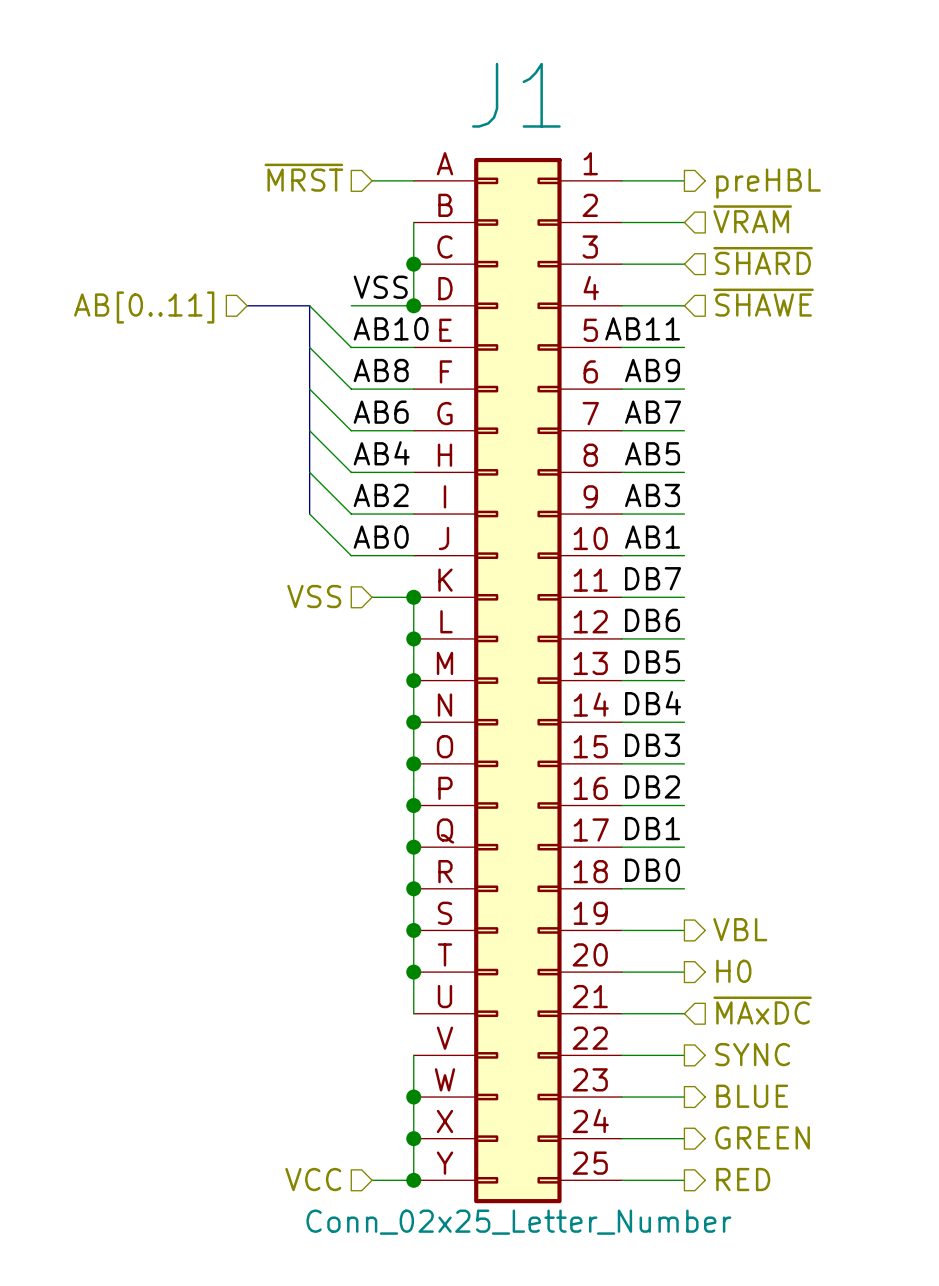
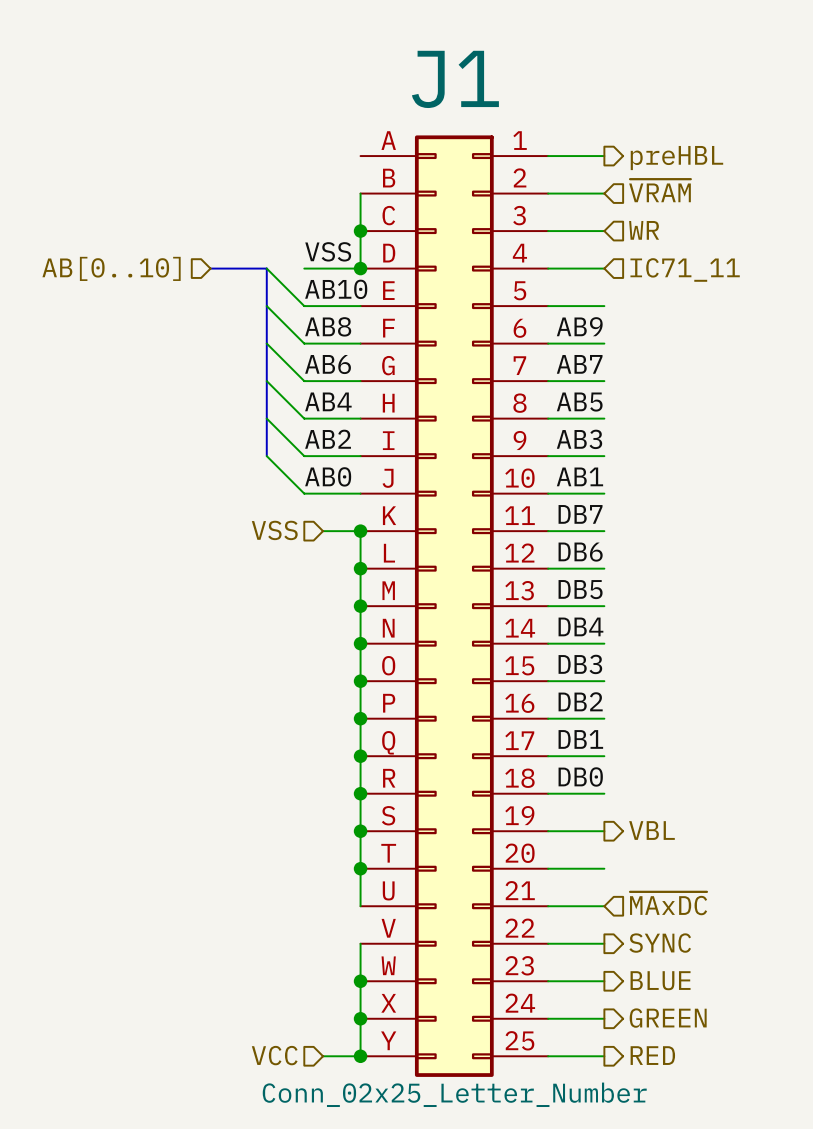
hierarchical label: ~{MRST} (303, 177) -> none
wire: (372, 180) (413, 180) -> none
hierarchical label: ~{SHARD} (763, 260) -> WR (644, 230)
hierarchical label: ~{SHAWE} (763, 302) -> IC71_11 (685, 269)
hierarchical label: AB[0..11] (144, 307) -> AB[0..10] (111, 268)
label: AB11 (642, 328) -> none
hierarchical label: H0 (733, 971) -> none

